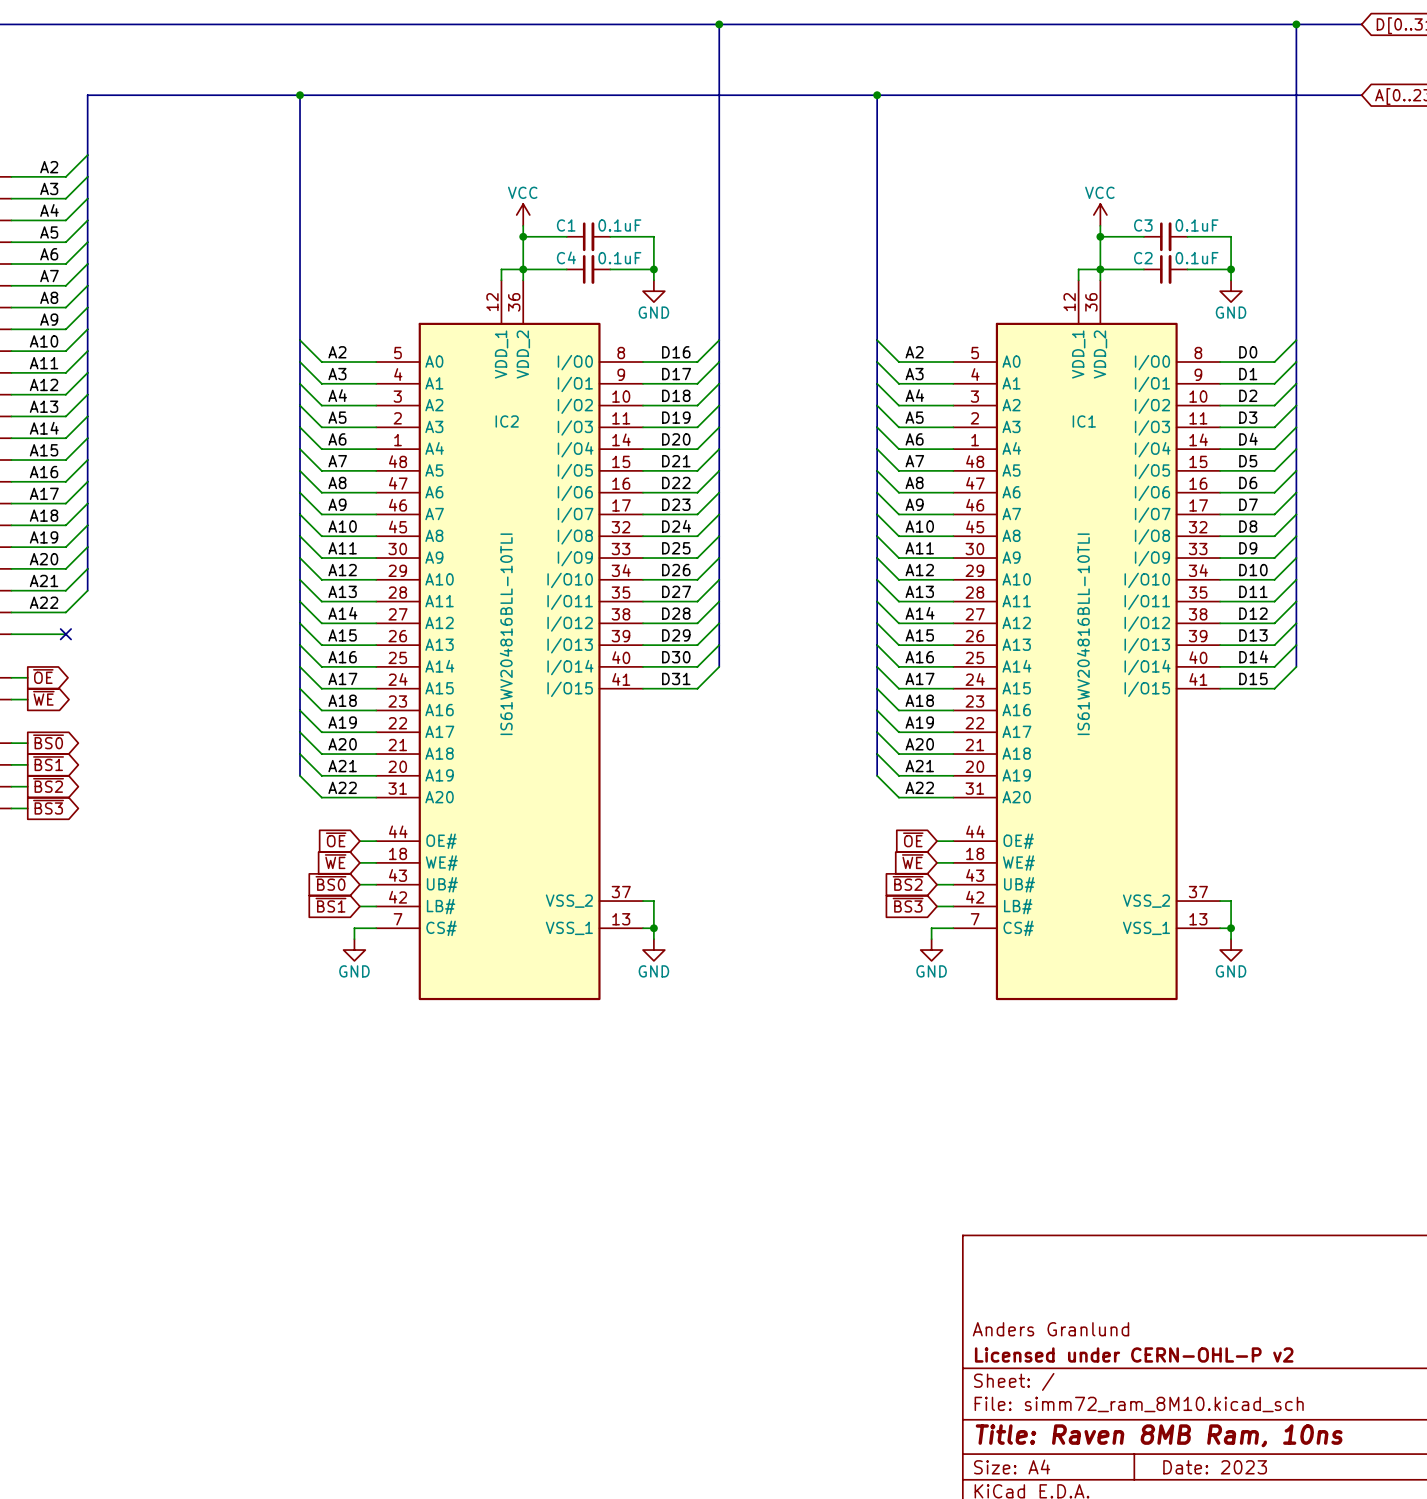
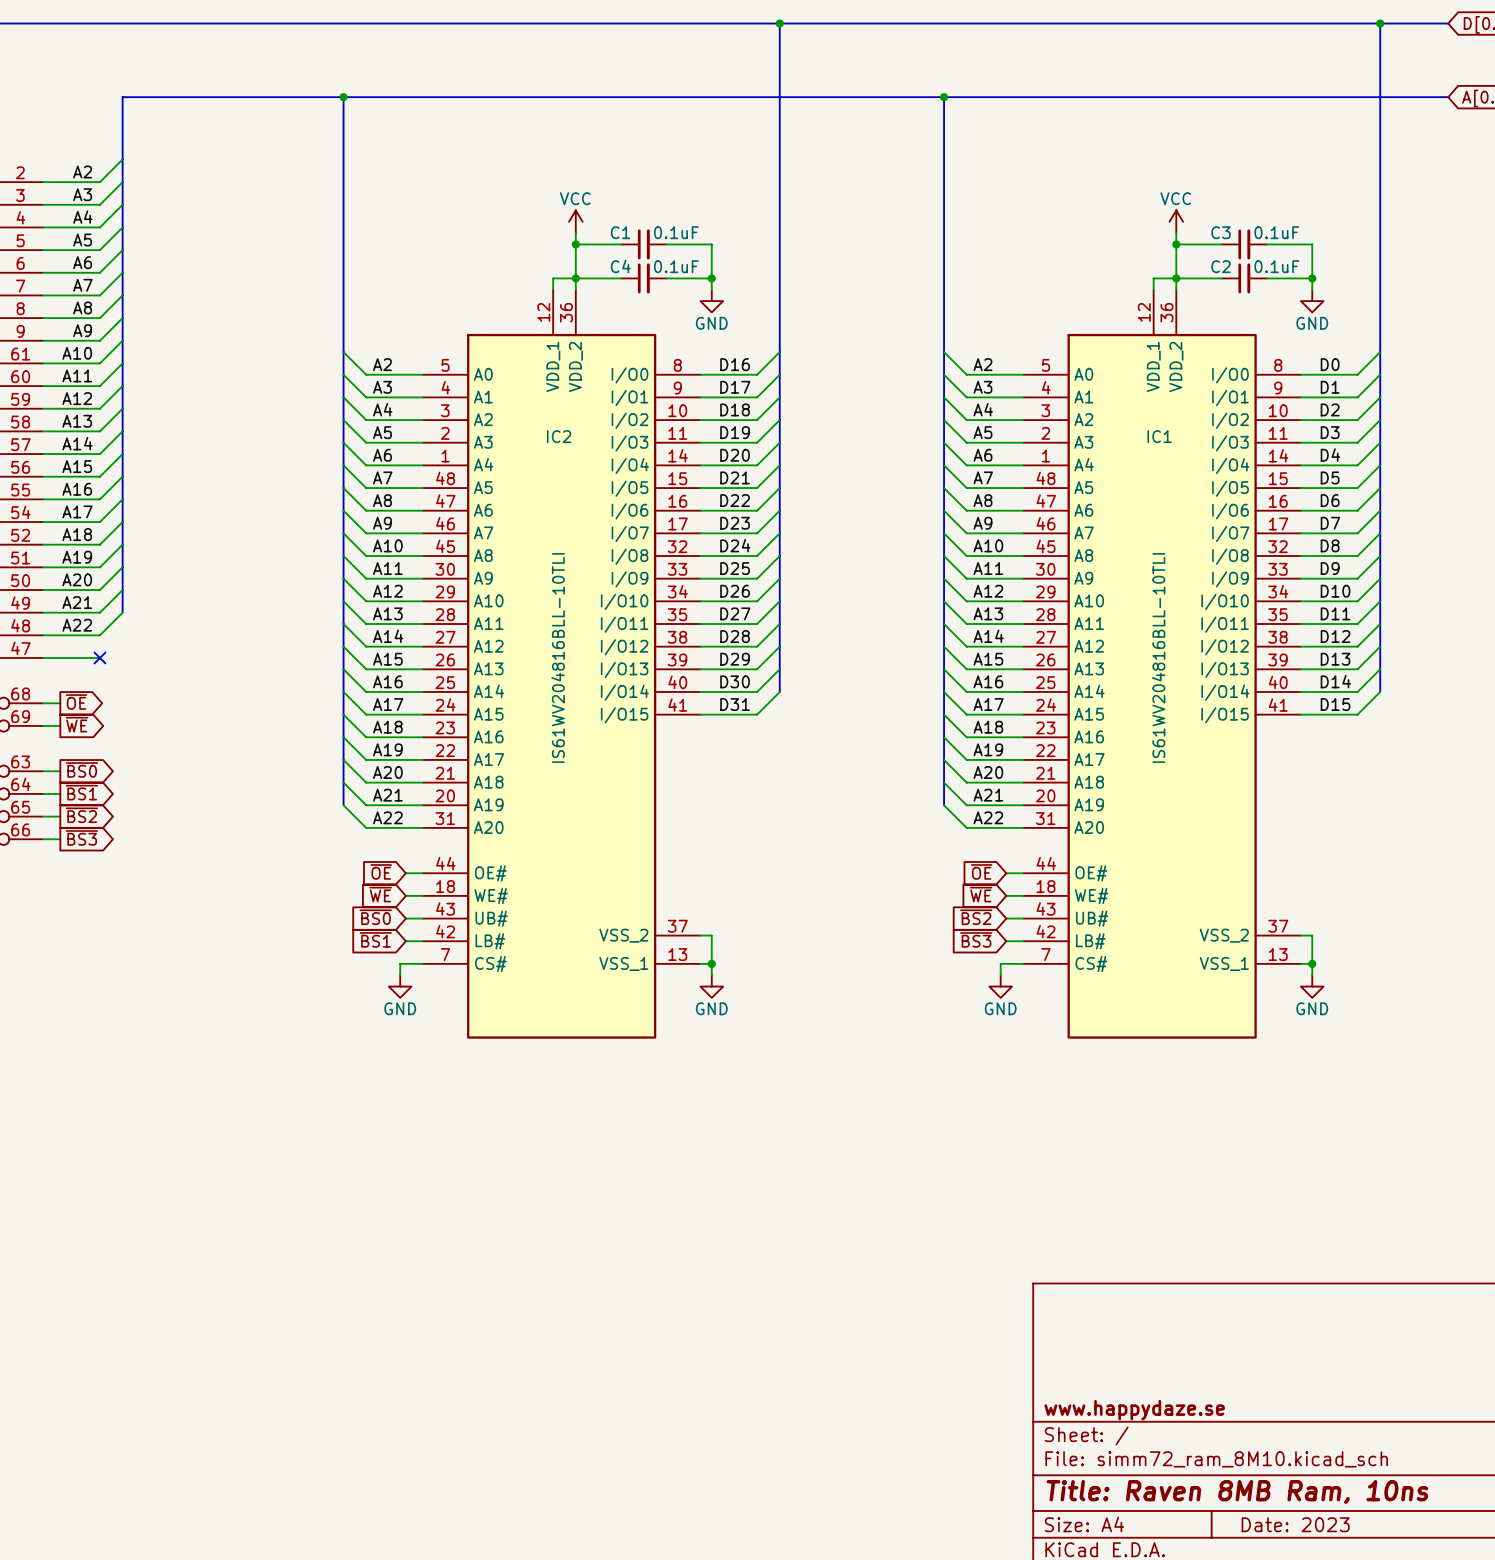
title block: Anders Granlund (1050, 1329) -> none
title block: Licensed under CERN-OHL-P v2 (1134, 1354) -> www.happydaze.se (1134, 1410)

